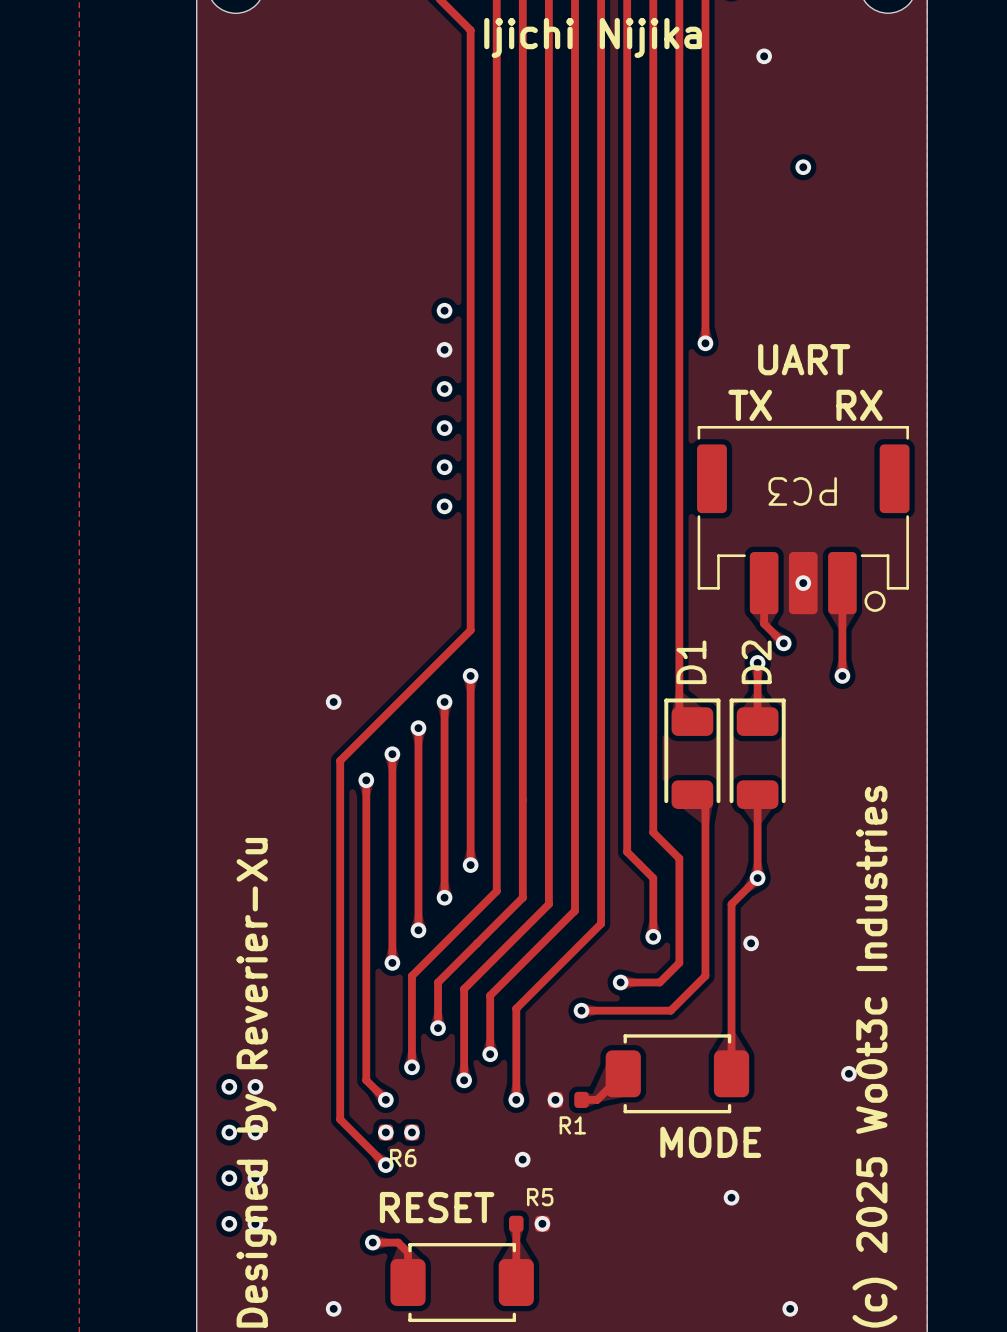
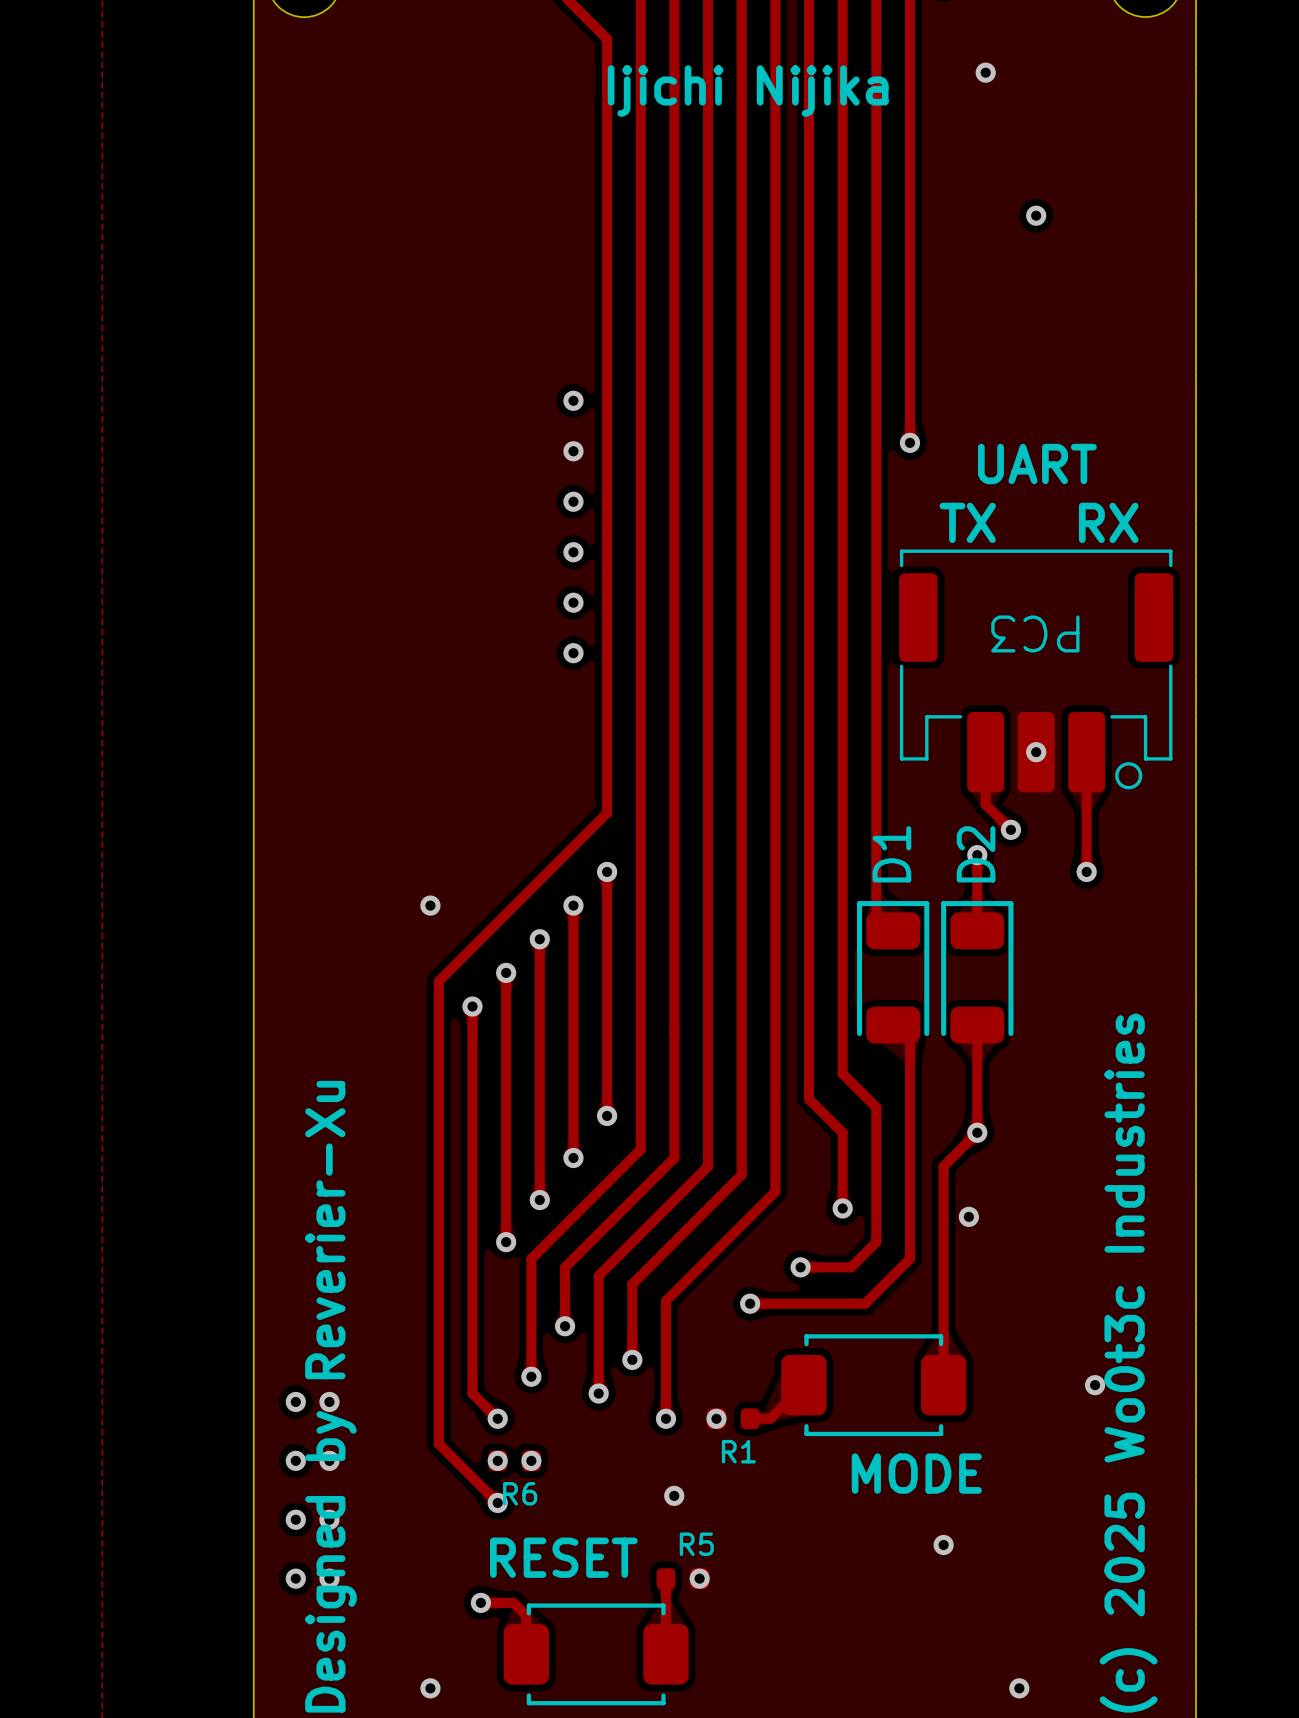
text position: Ijichi Nijika (593, 37) -> Ijichi Nijika (748, 91)

